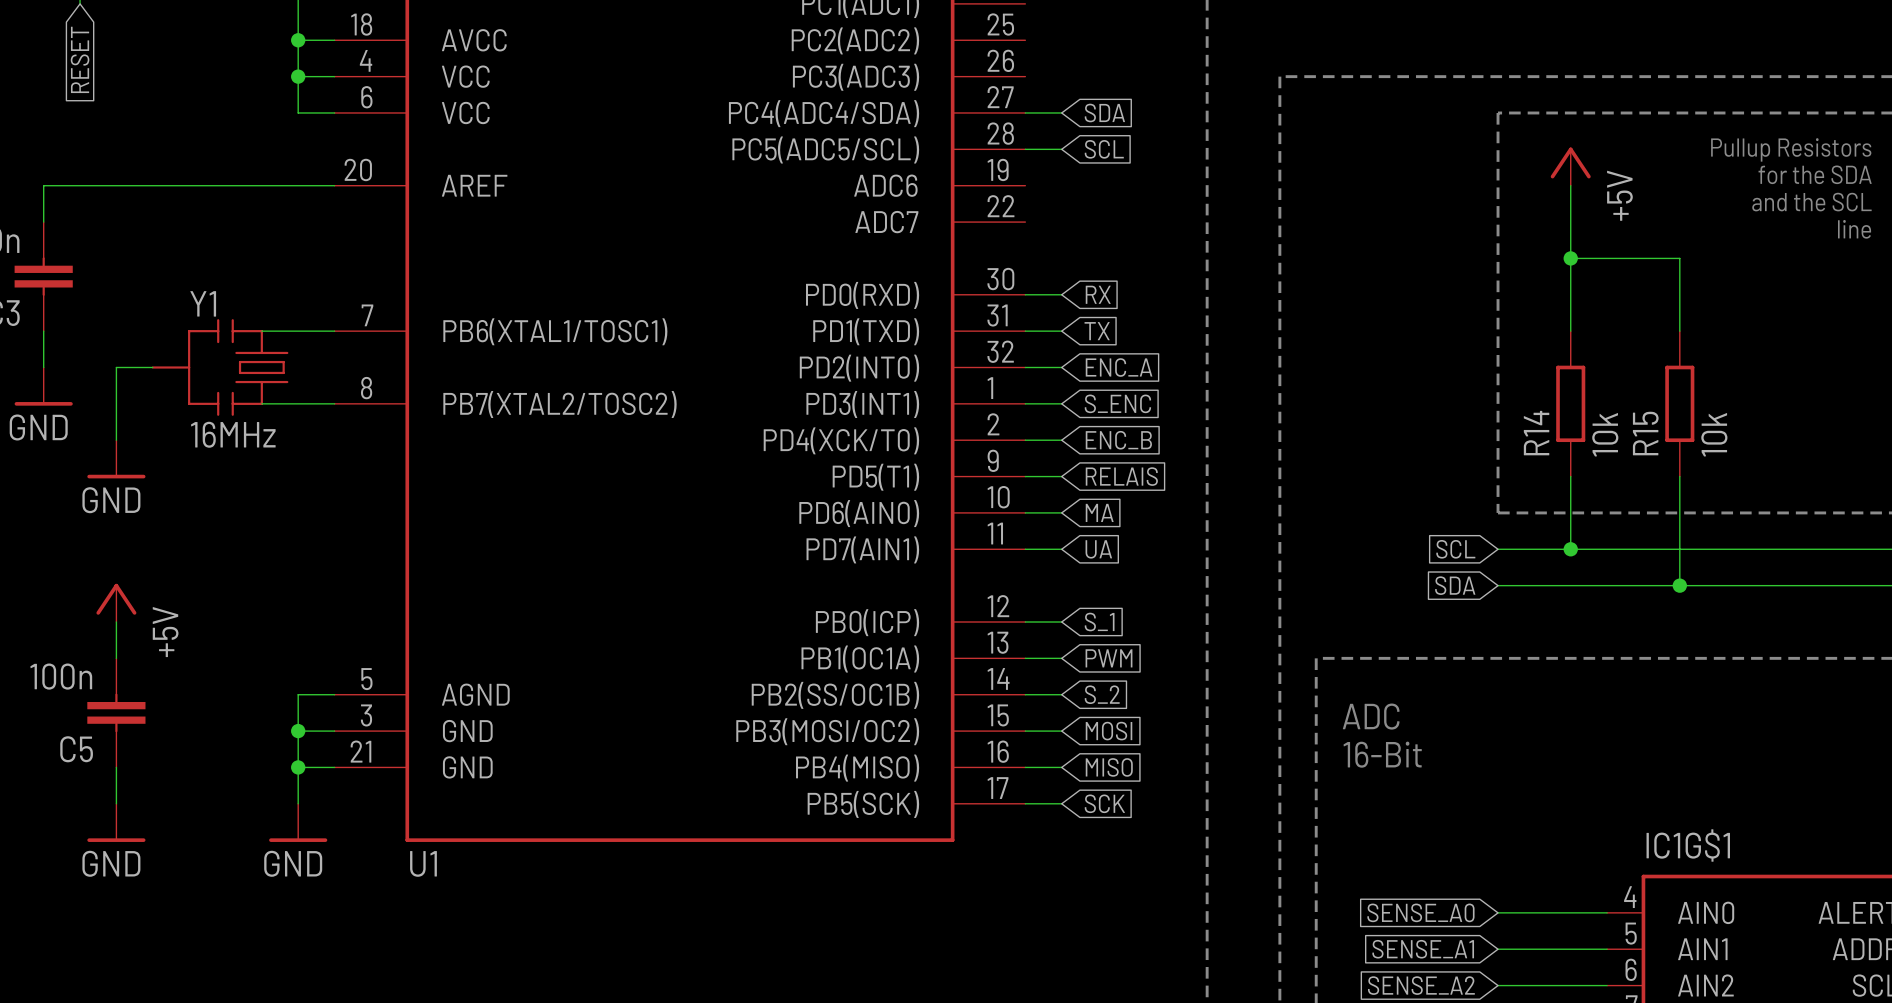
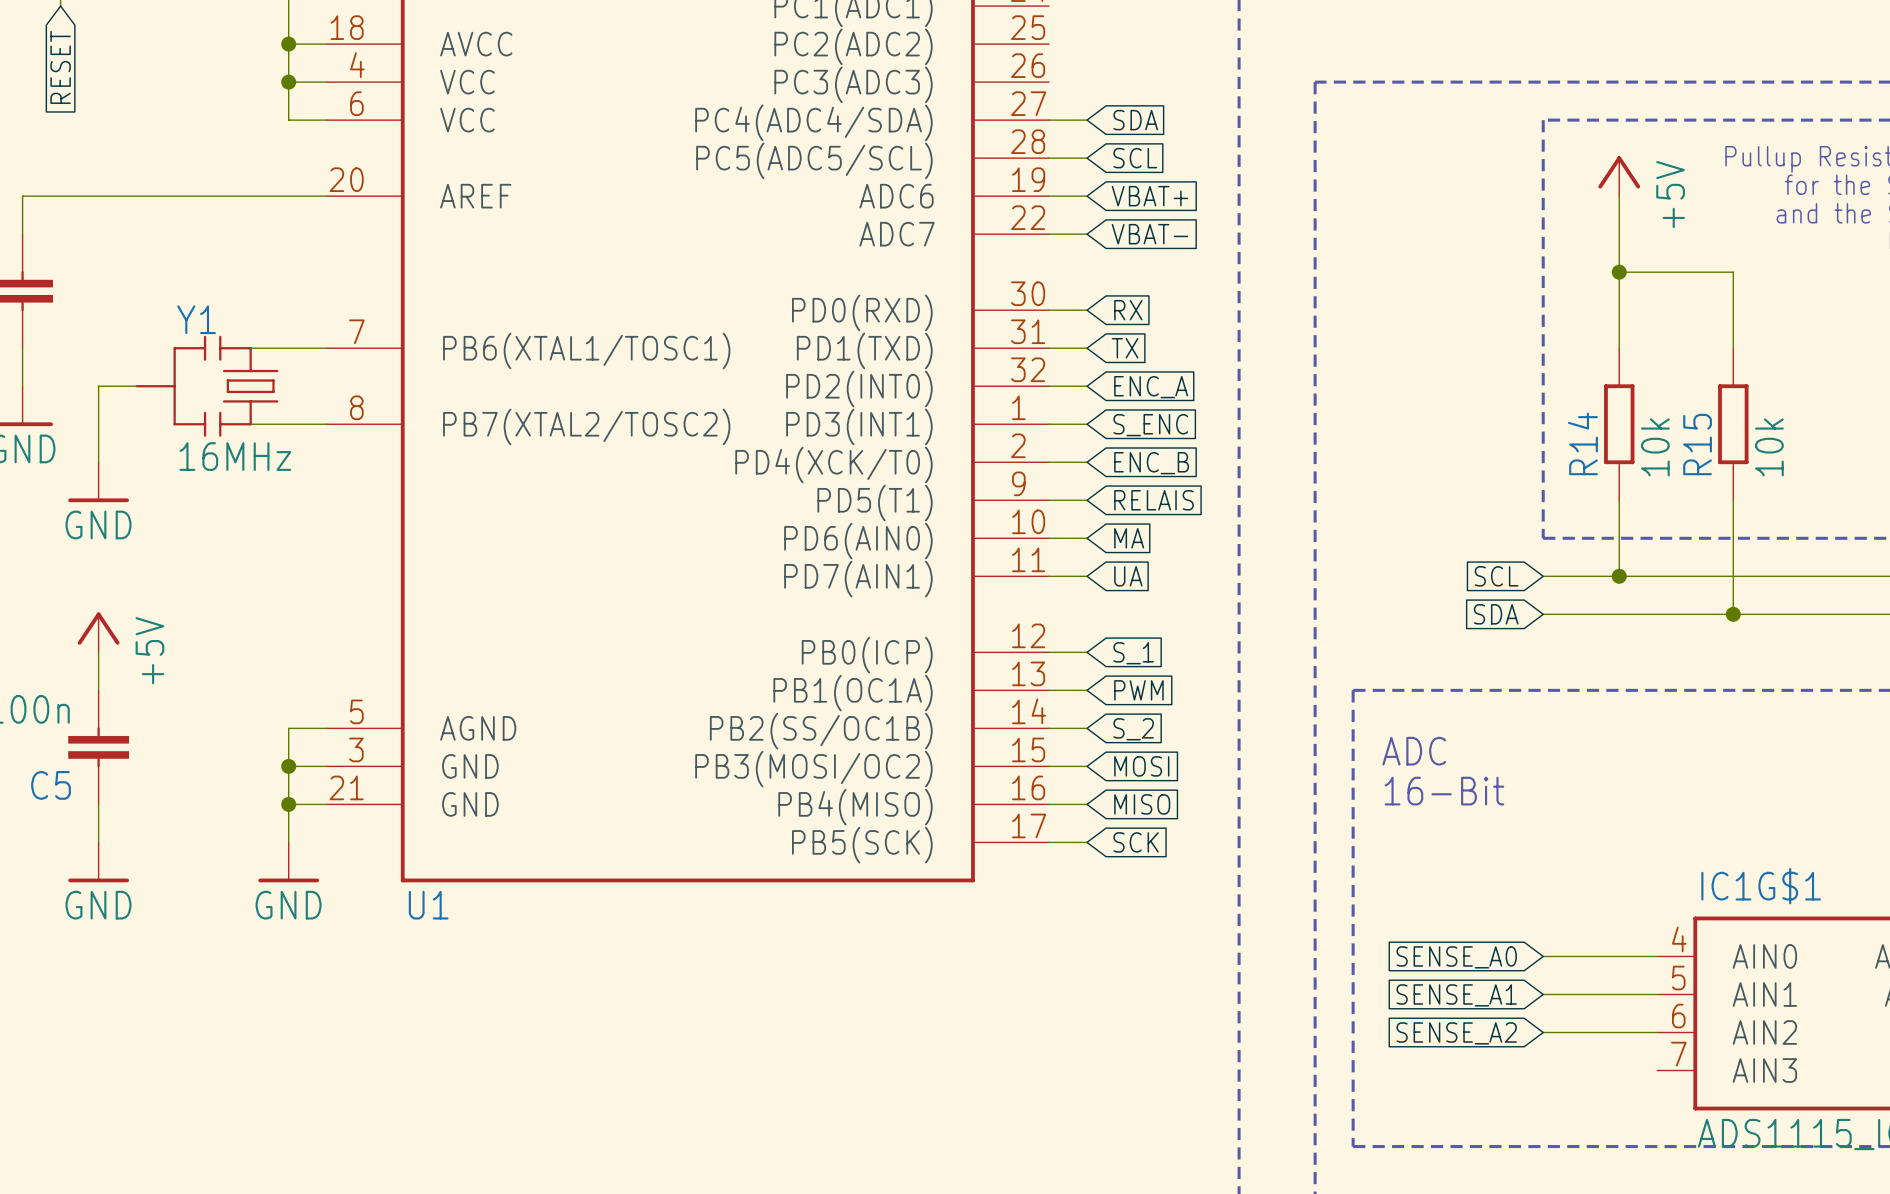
wire: none -> (1049, 196) (1087, 196)
global label: none -> VBAT+ (1149, 196)
wire: none -> (1049, 234) (1087, 234)
global label: none -> VBAT- (1149, 234)

